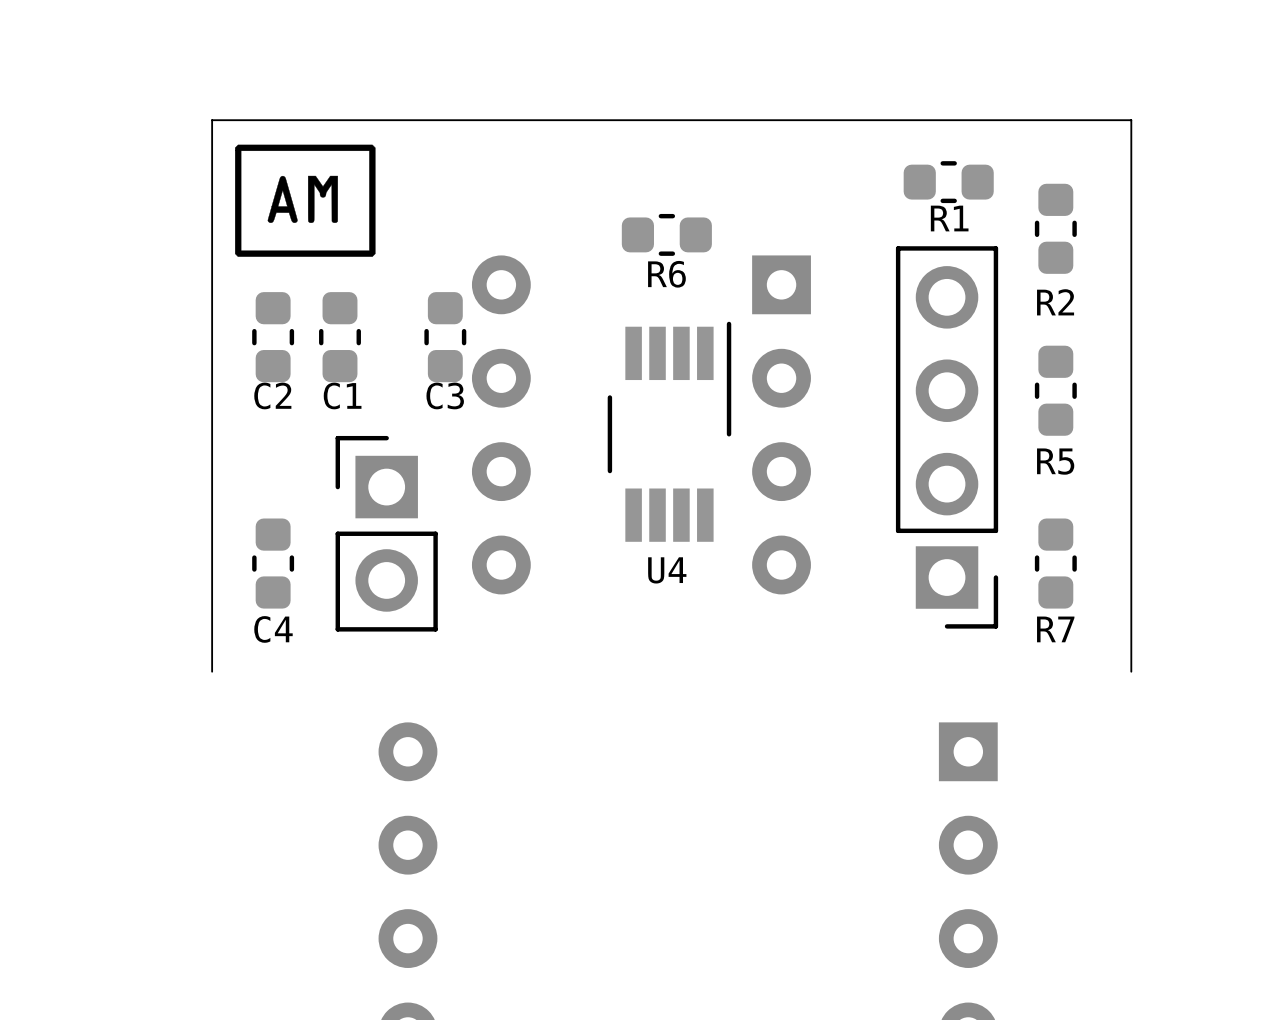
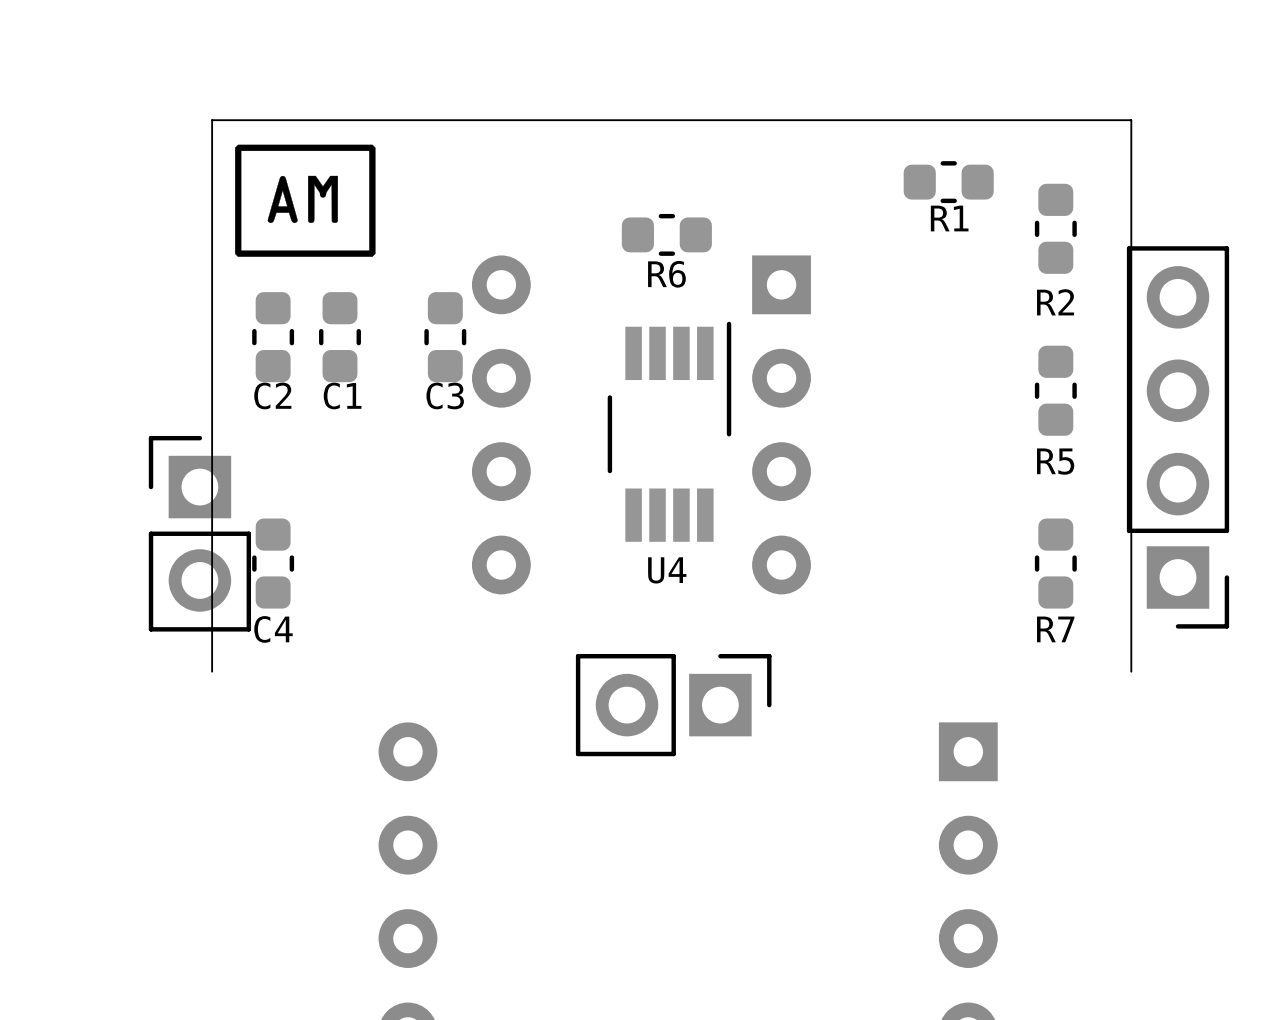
part position: (947, 437) -> (1178, 437)
part: none -> (199, 533)
part: (386, 533) -> none
part: none -> (673, 705)

